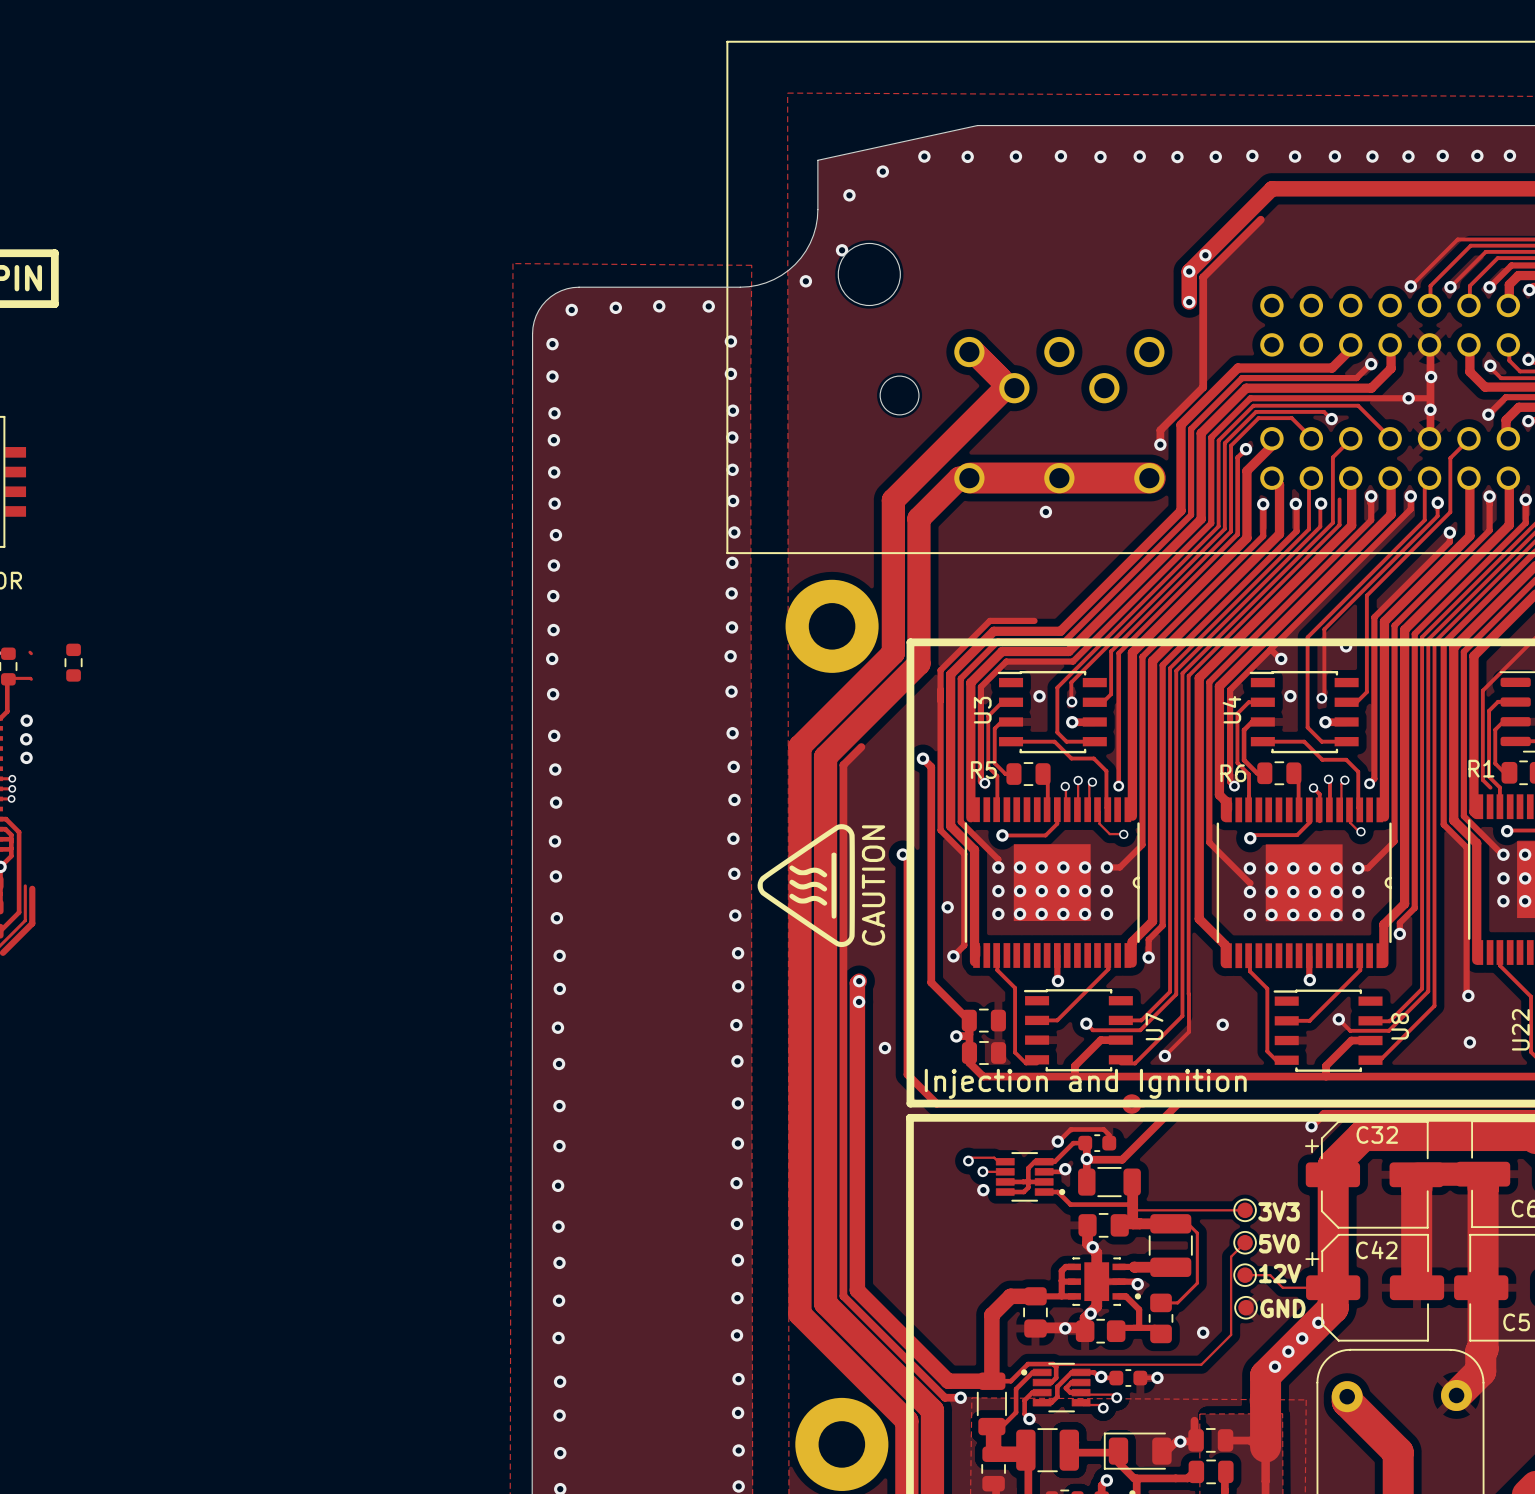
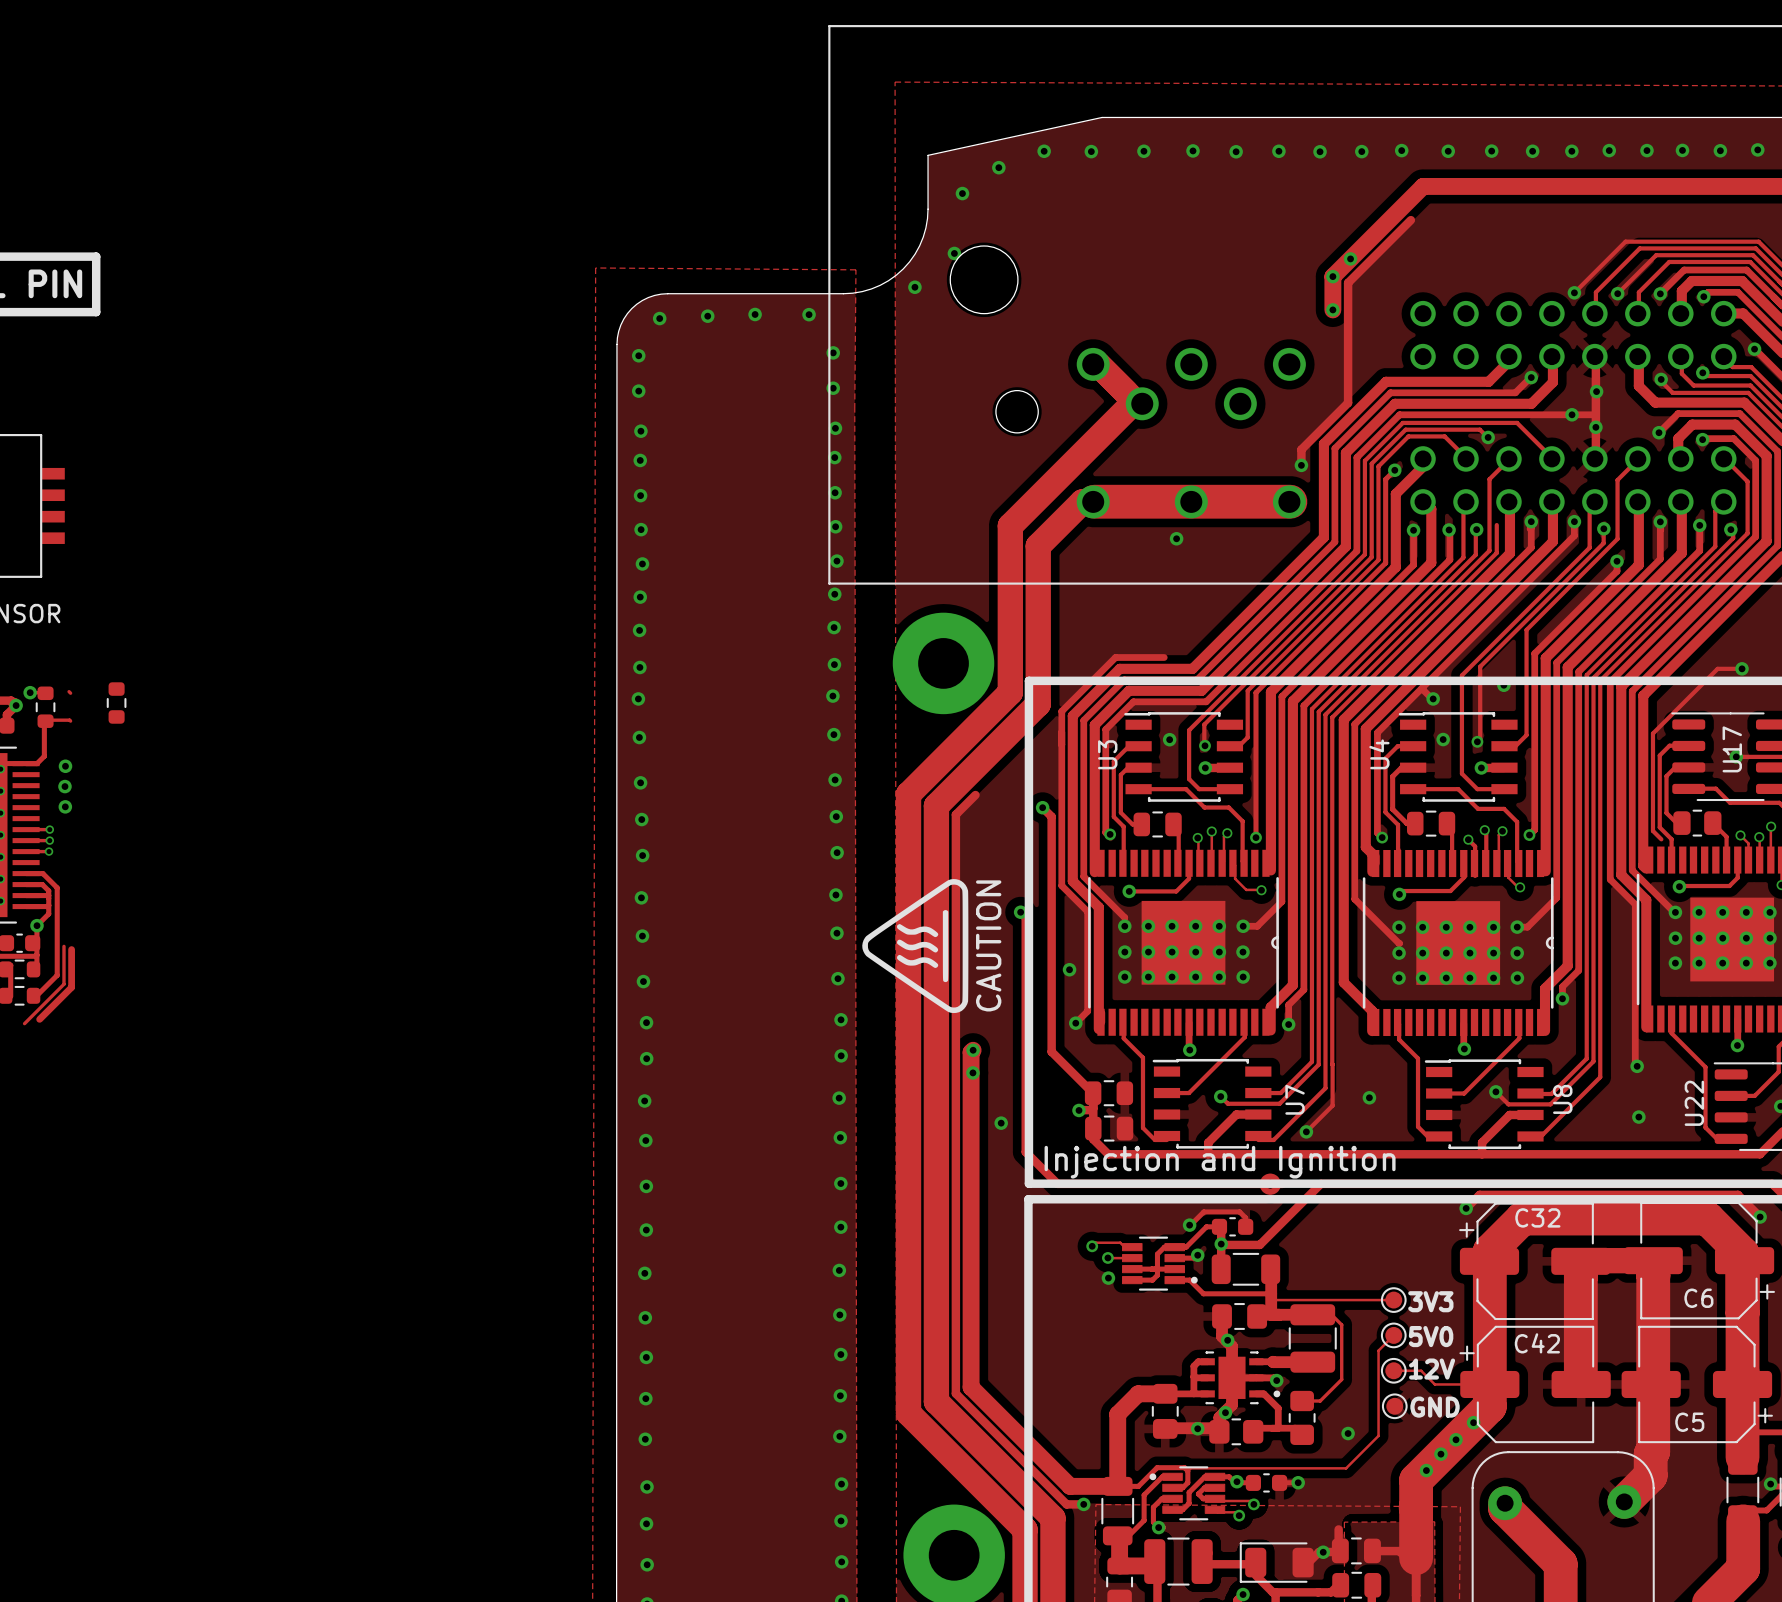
R1 name: R1 (1481, 768) -> none
R5 name: R5 (983, 770) -> none
R6 name: R6 (1233, 773) -> none

